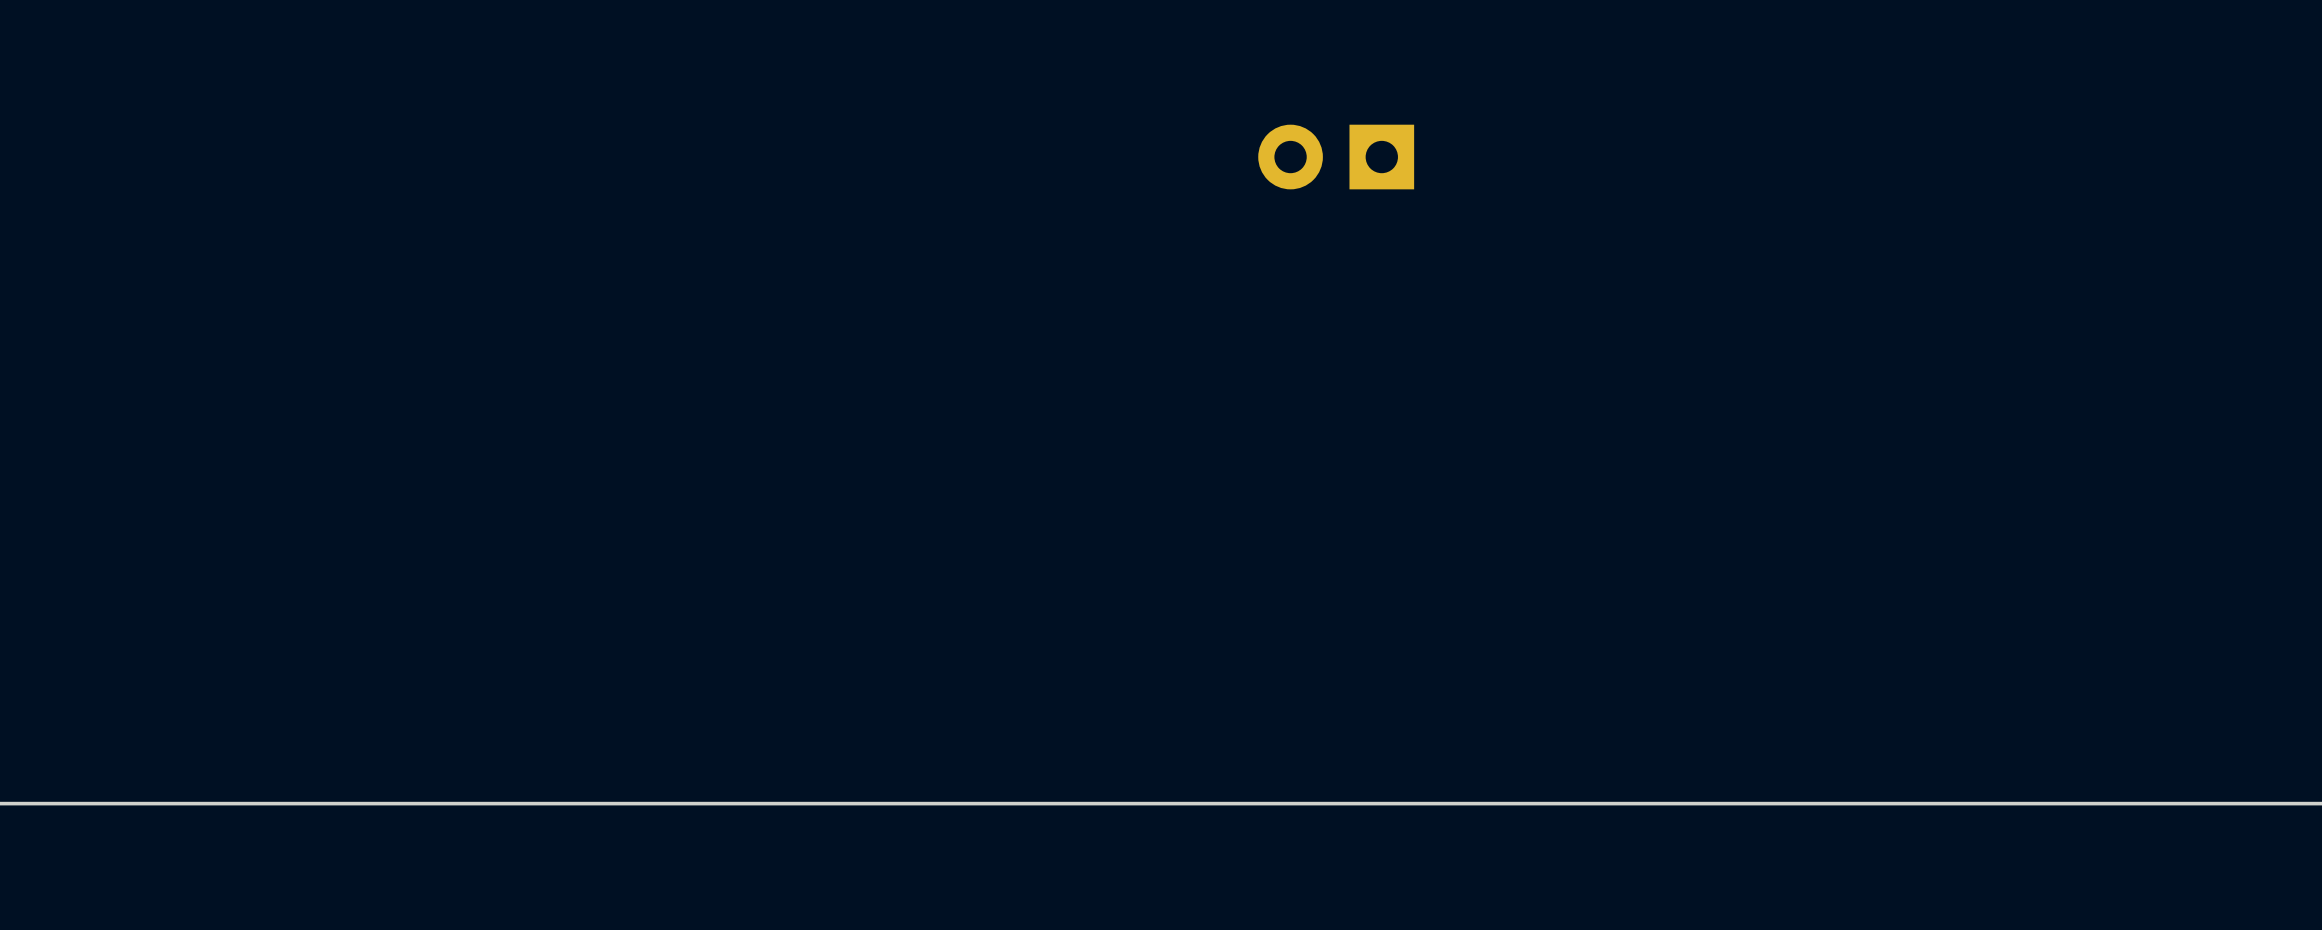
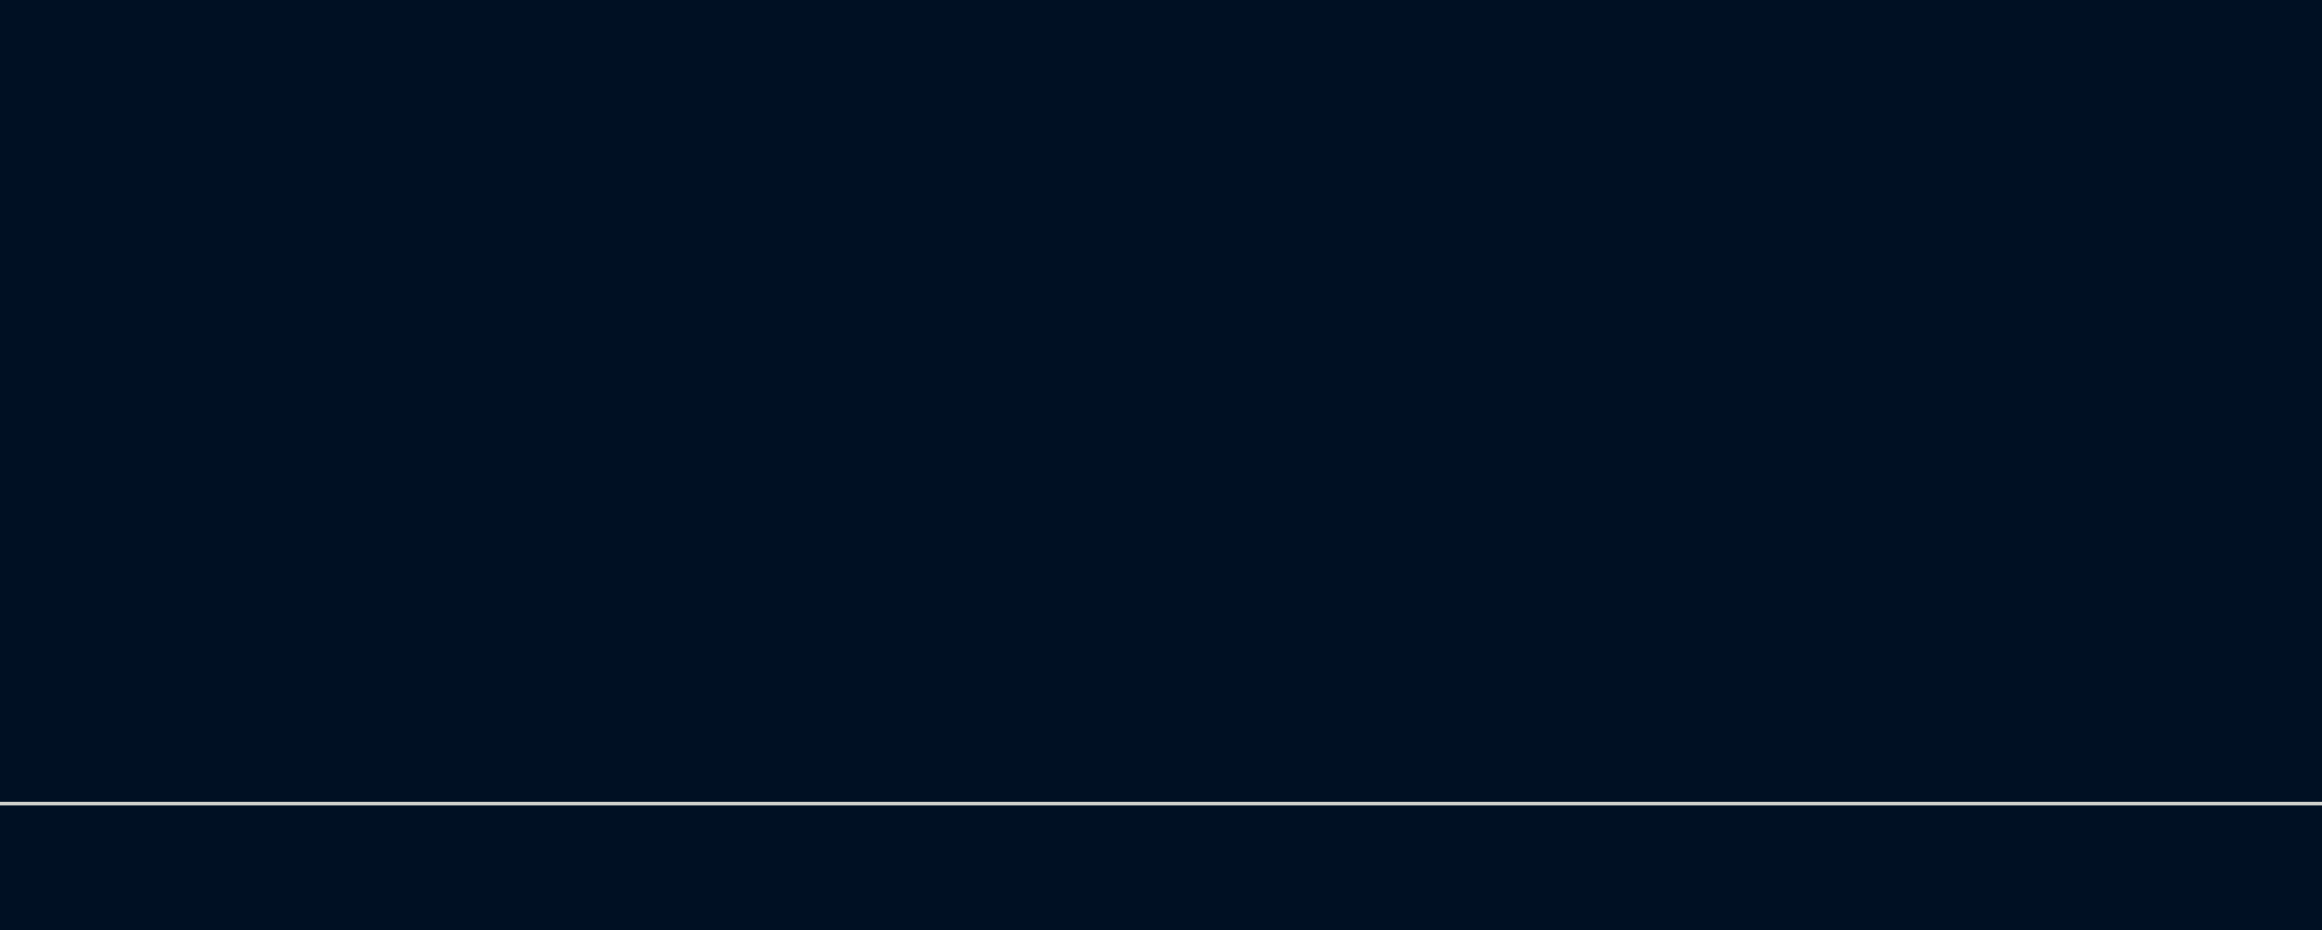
part: (1336, 157) -> none

